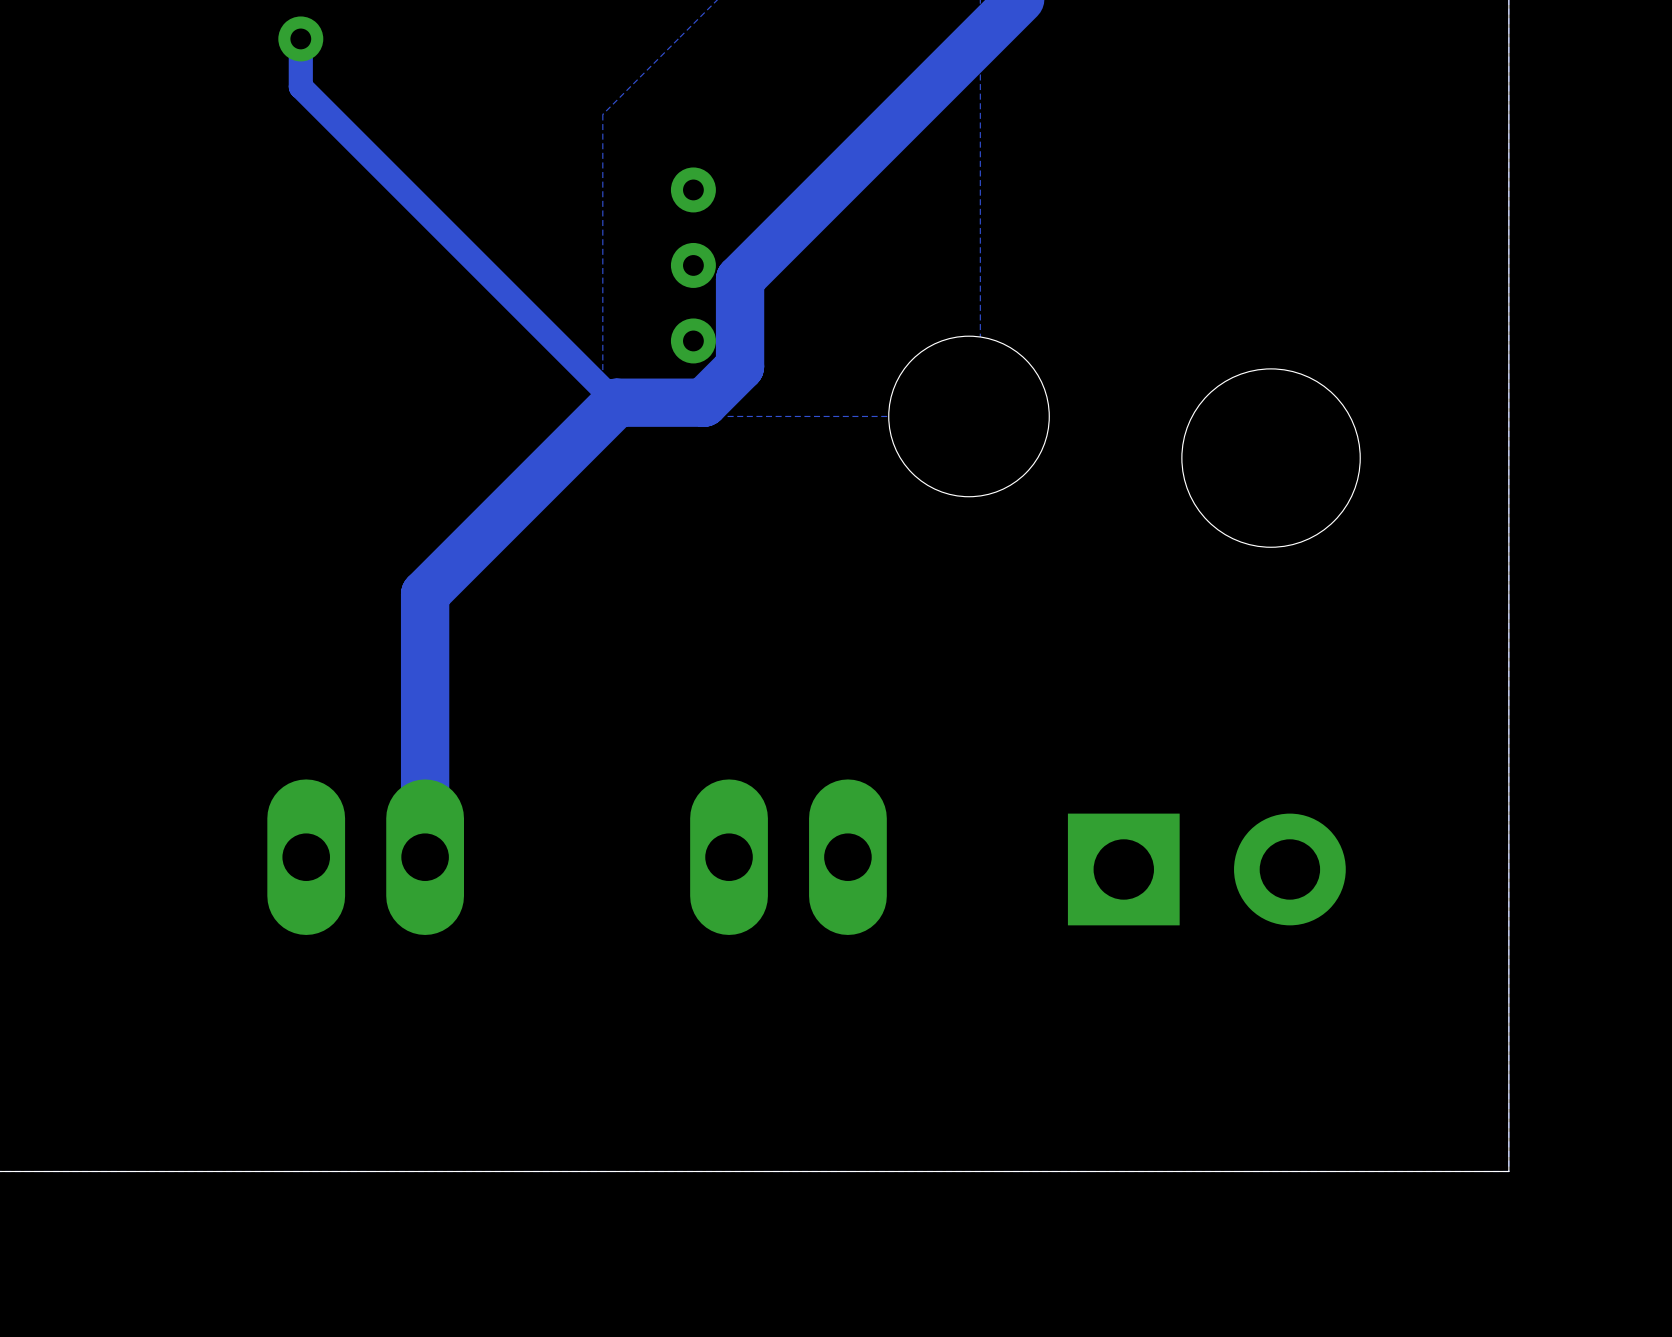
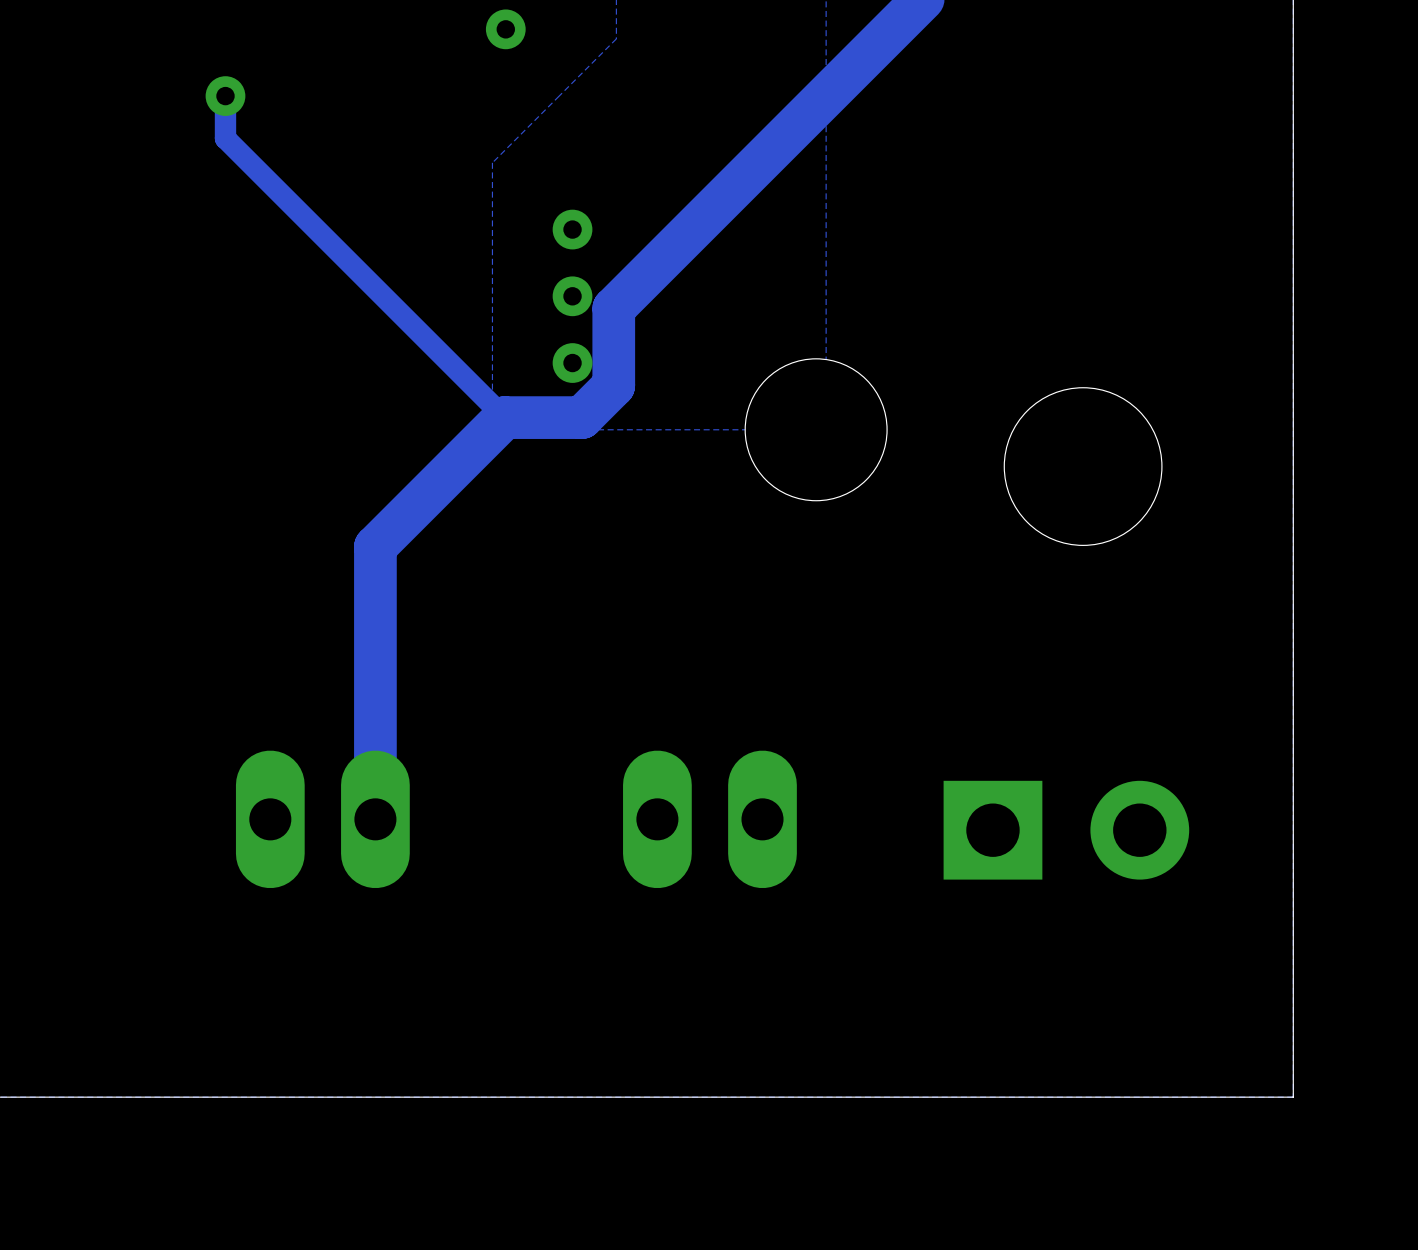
track: (470, 548) (425, 594) (425, 857) -> (375, 546) (375, 819)
part position: (365, 857) -> (322, 819)
part position: (788, 857) -> (709, 819)
part position: (1206, 869) -> (1066, 830)

